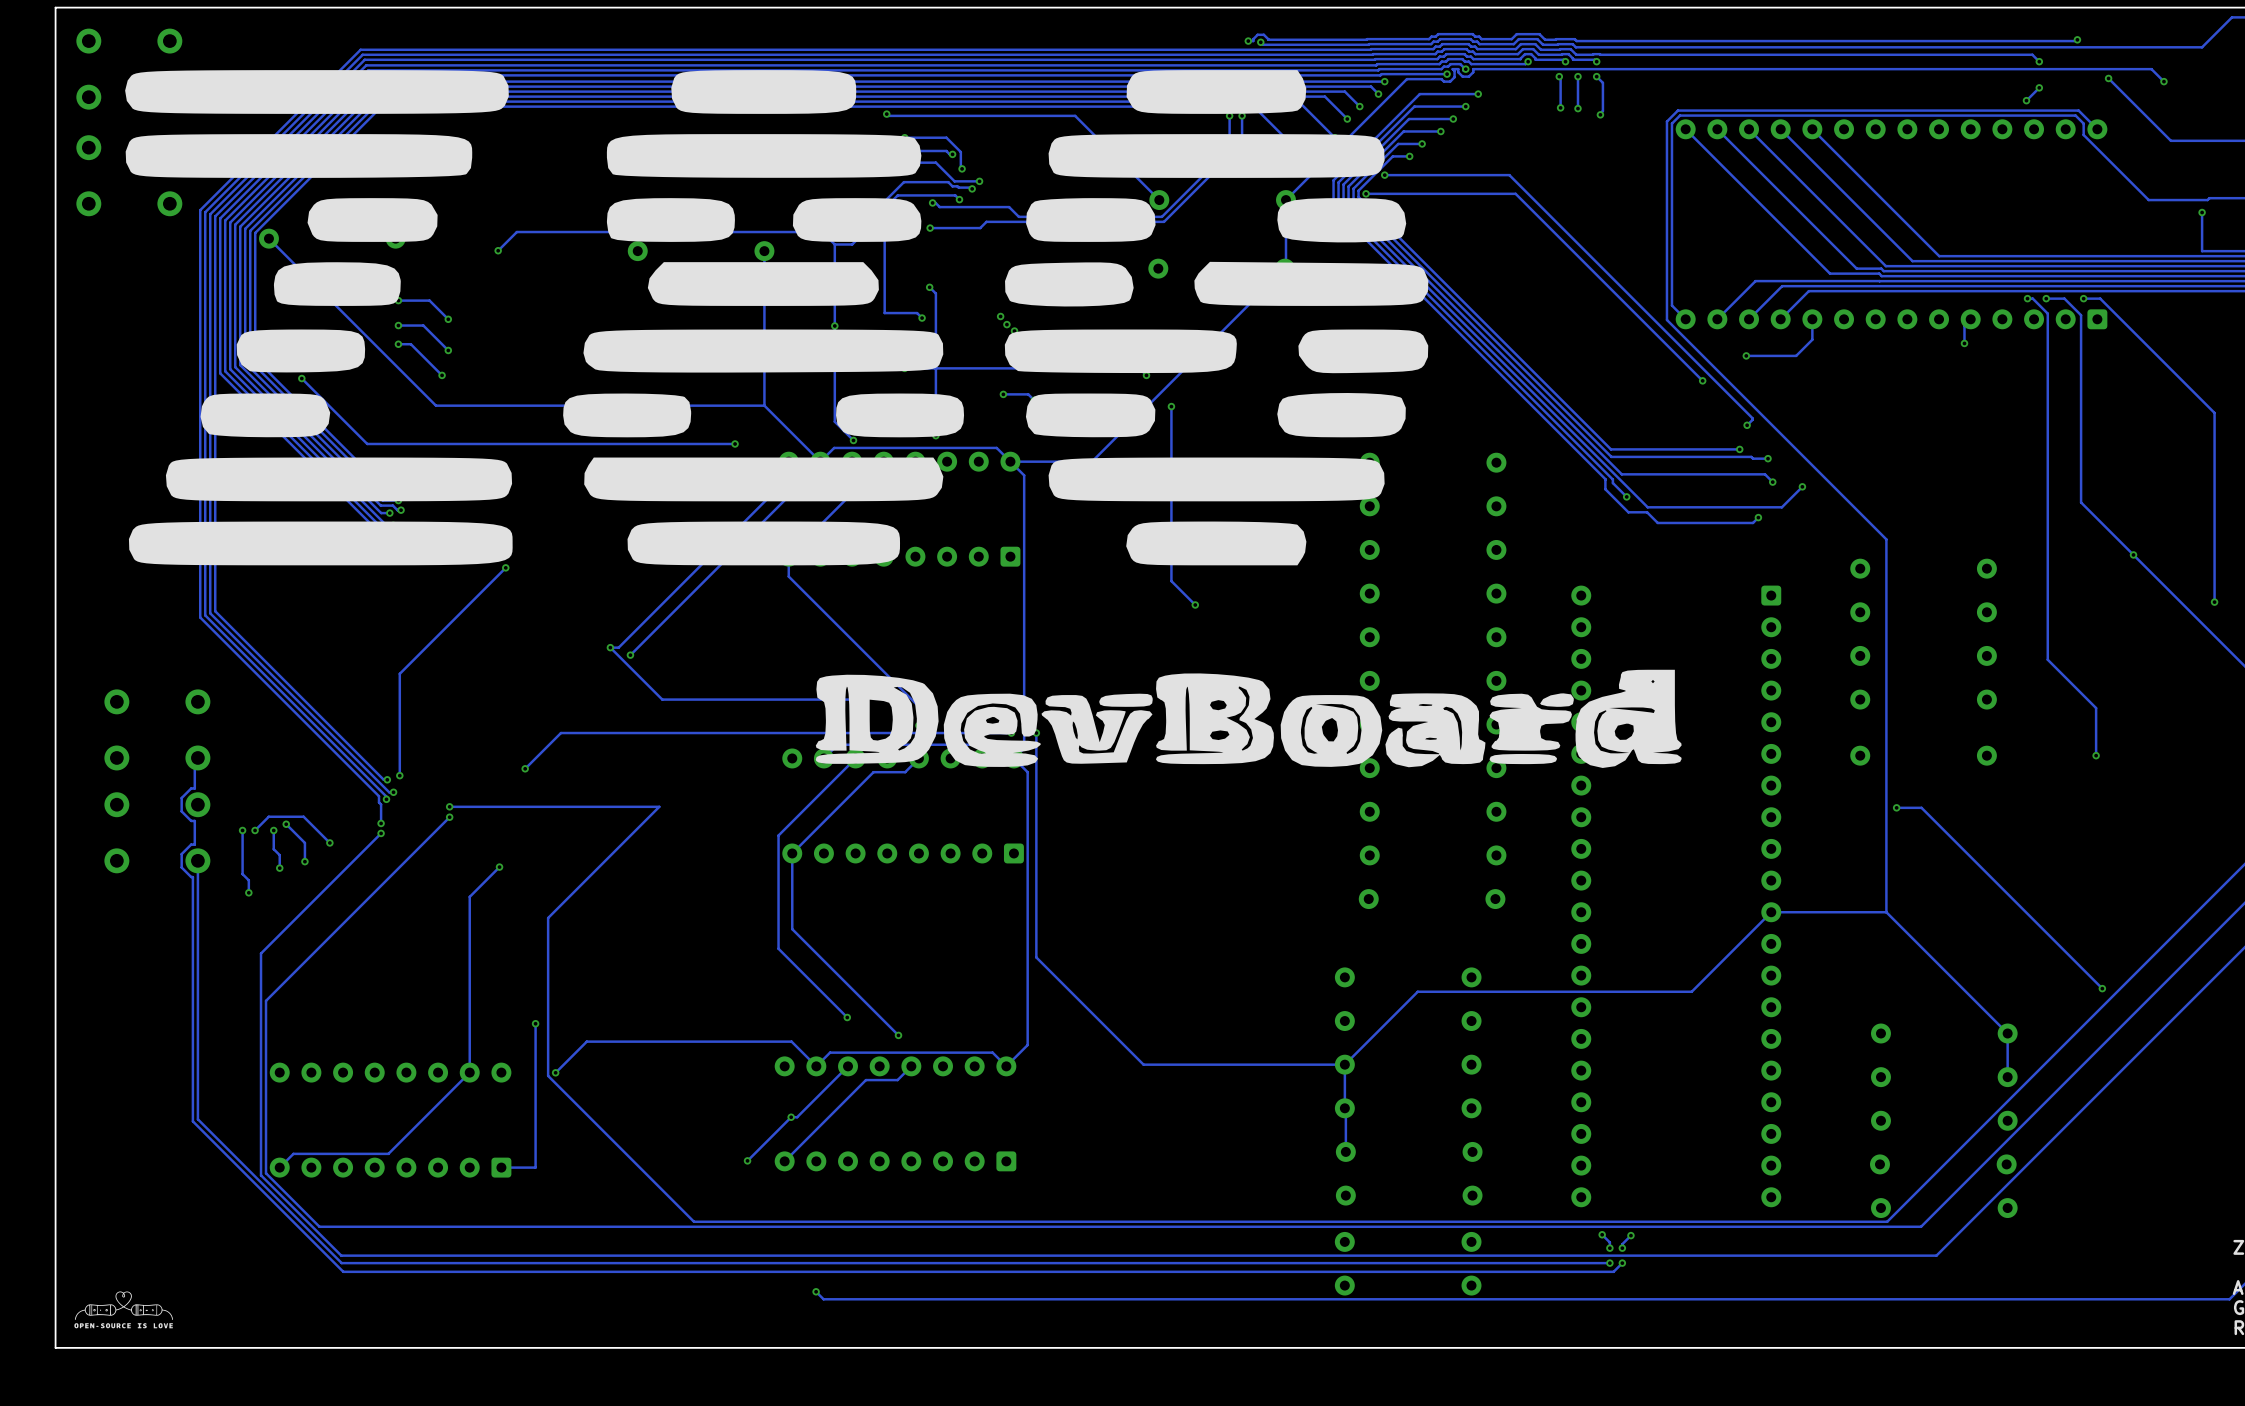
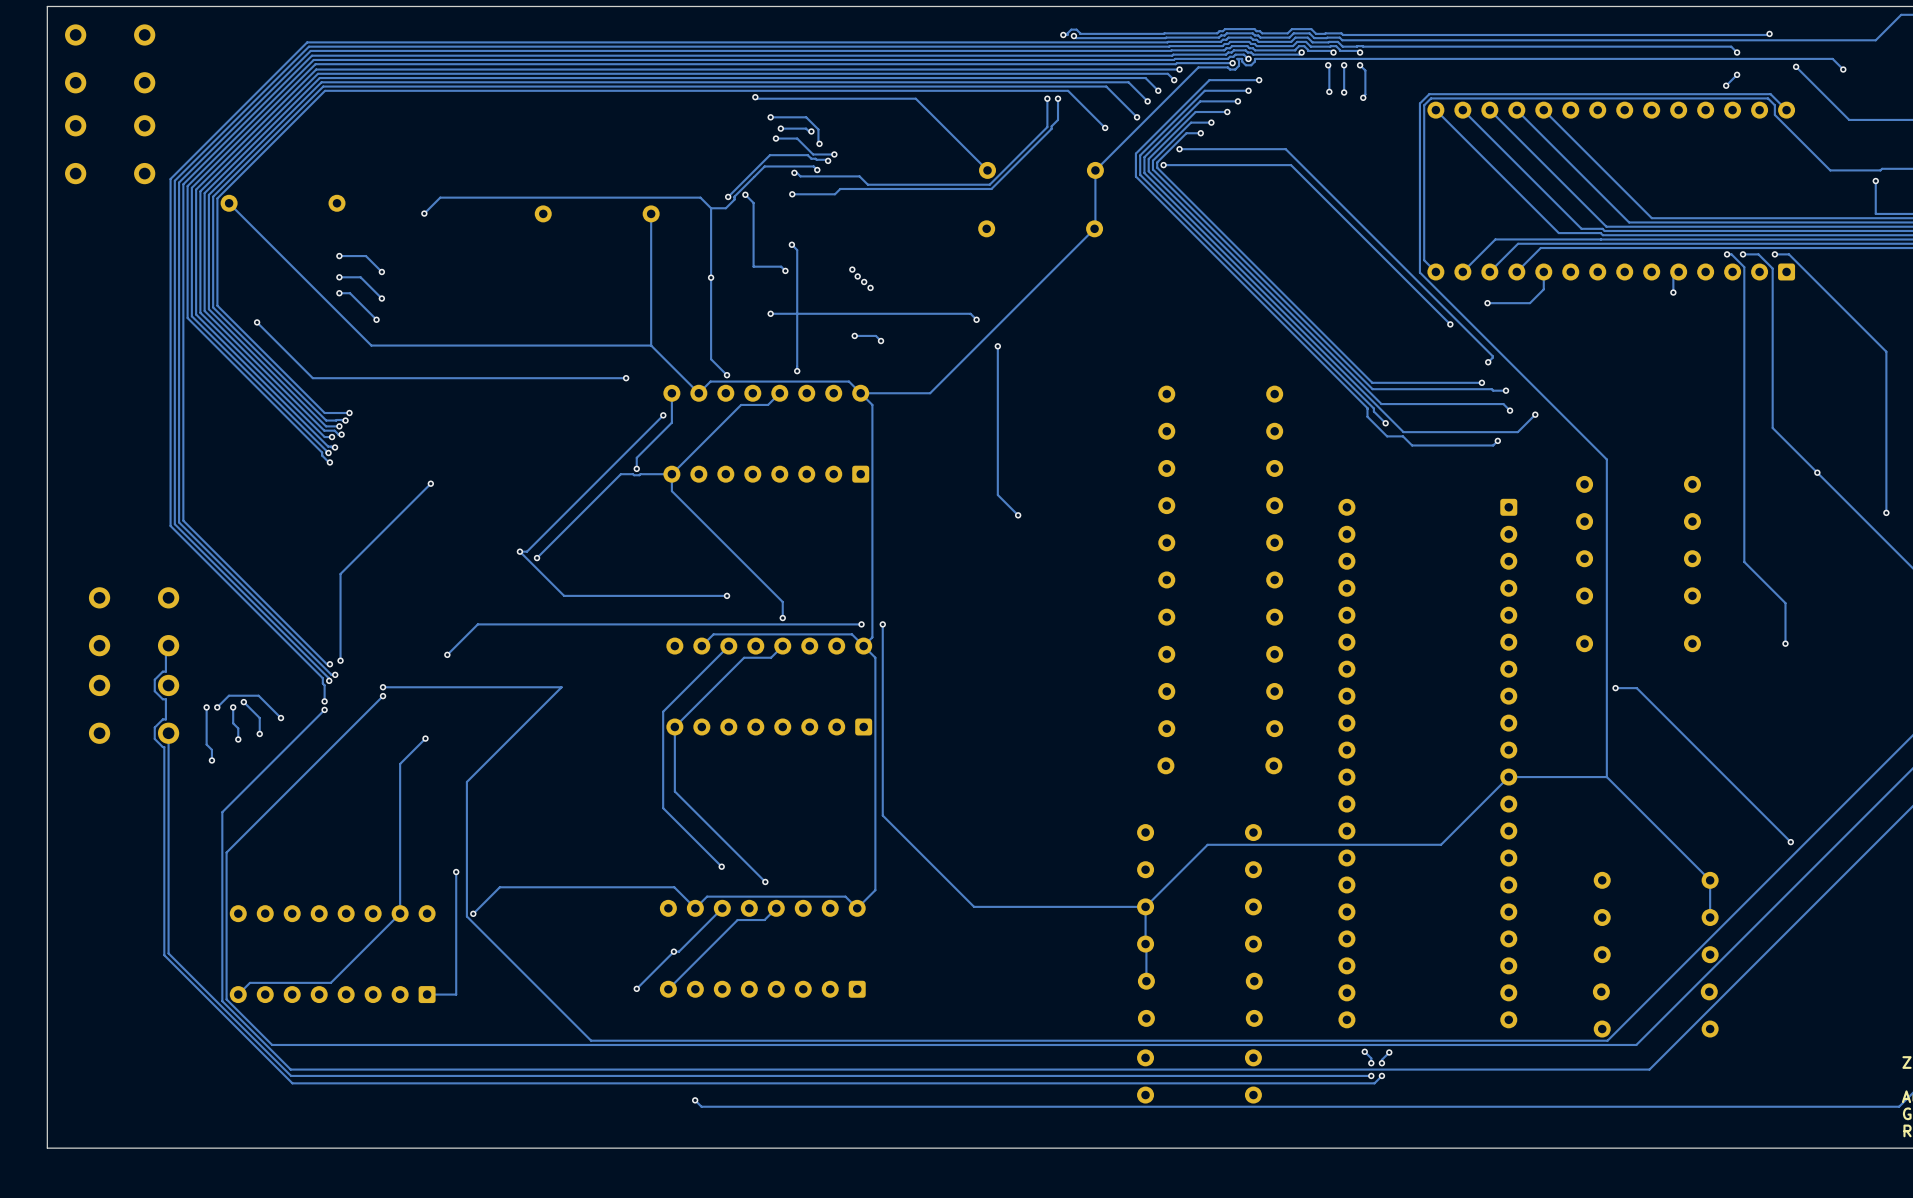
drawing: [125, 70, 1682, 768] -> none
drawing: [74, 1291, 174, 1329] -> none

